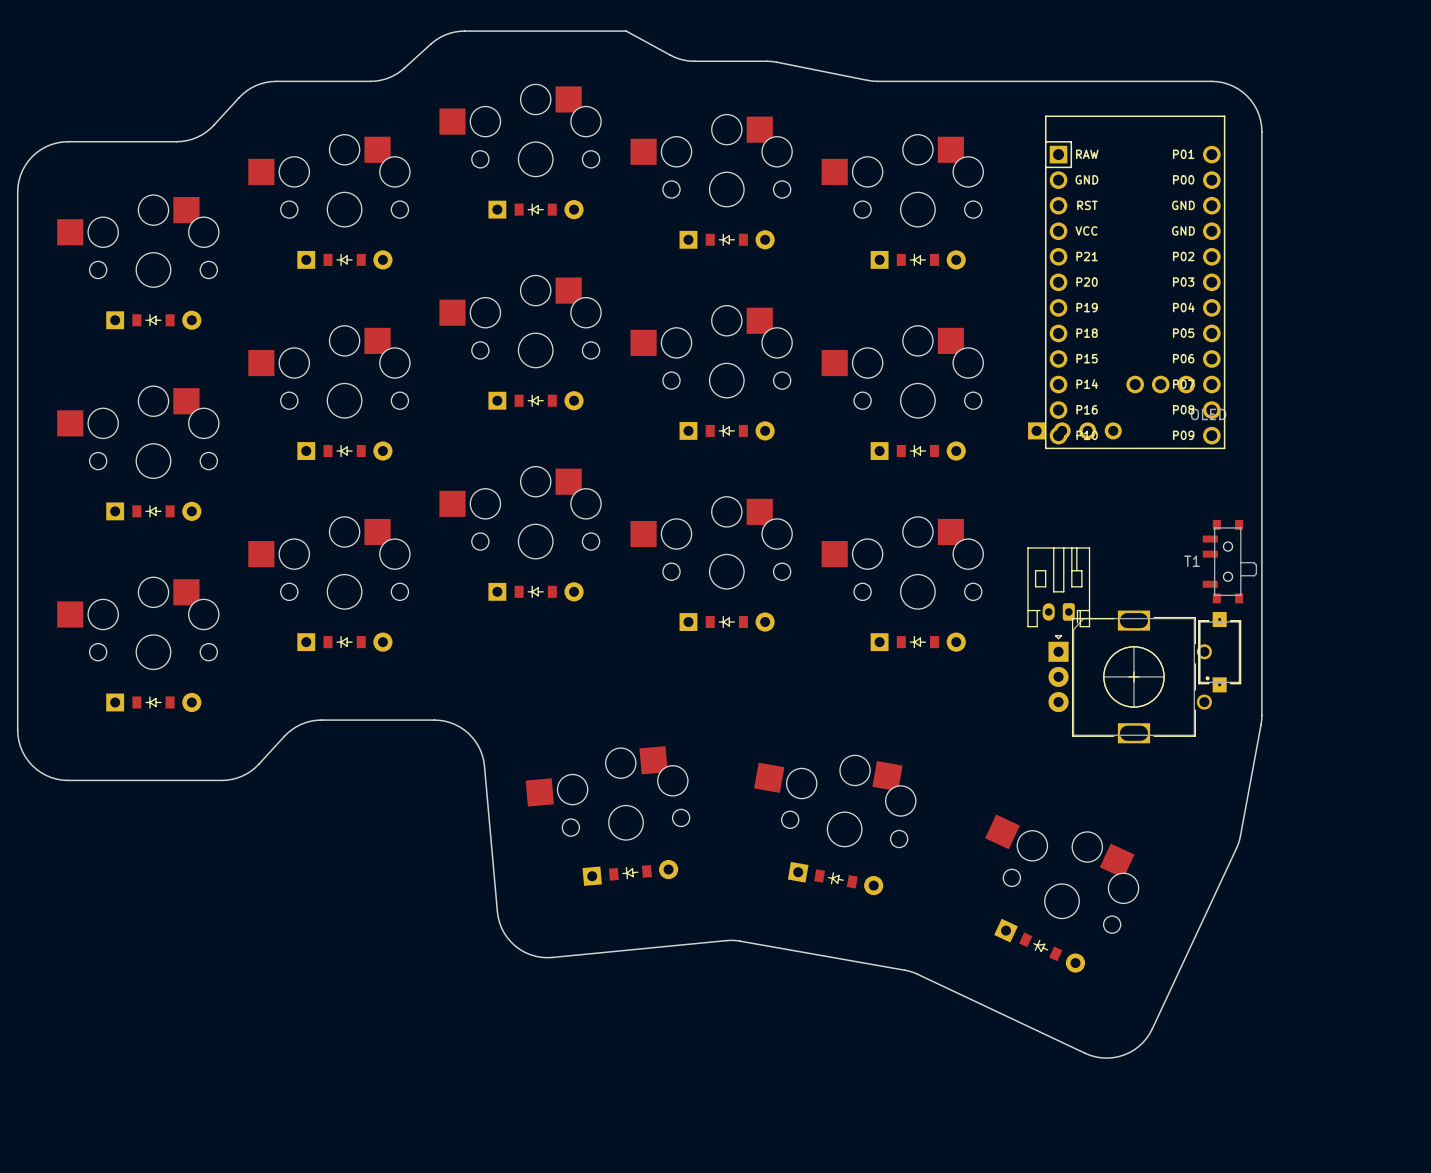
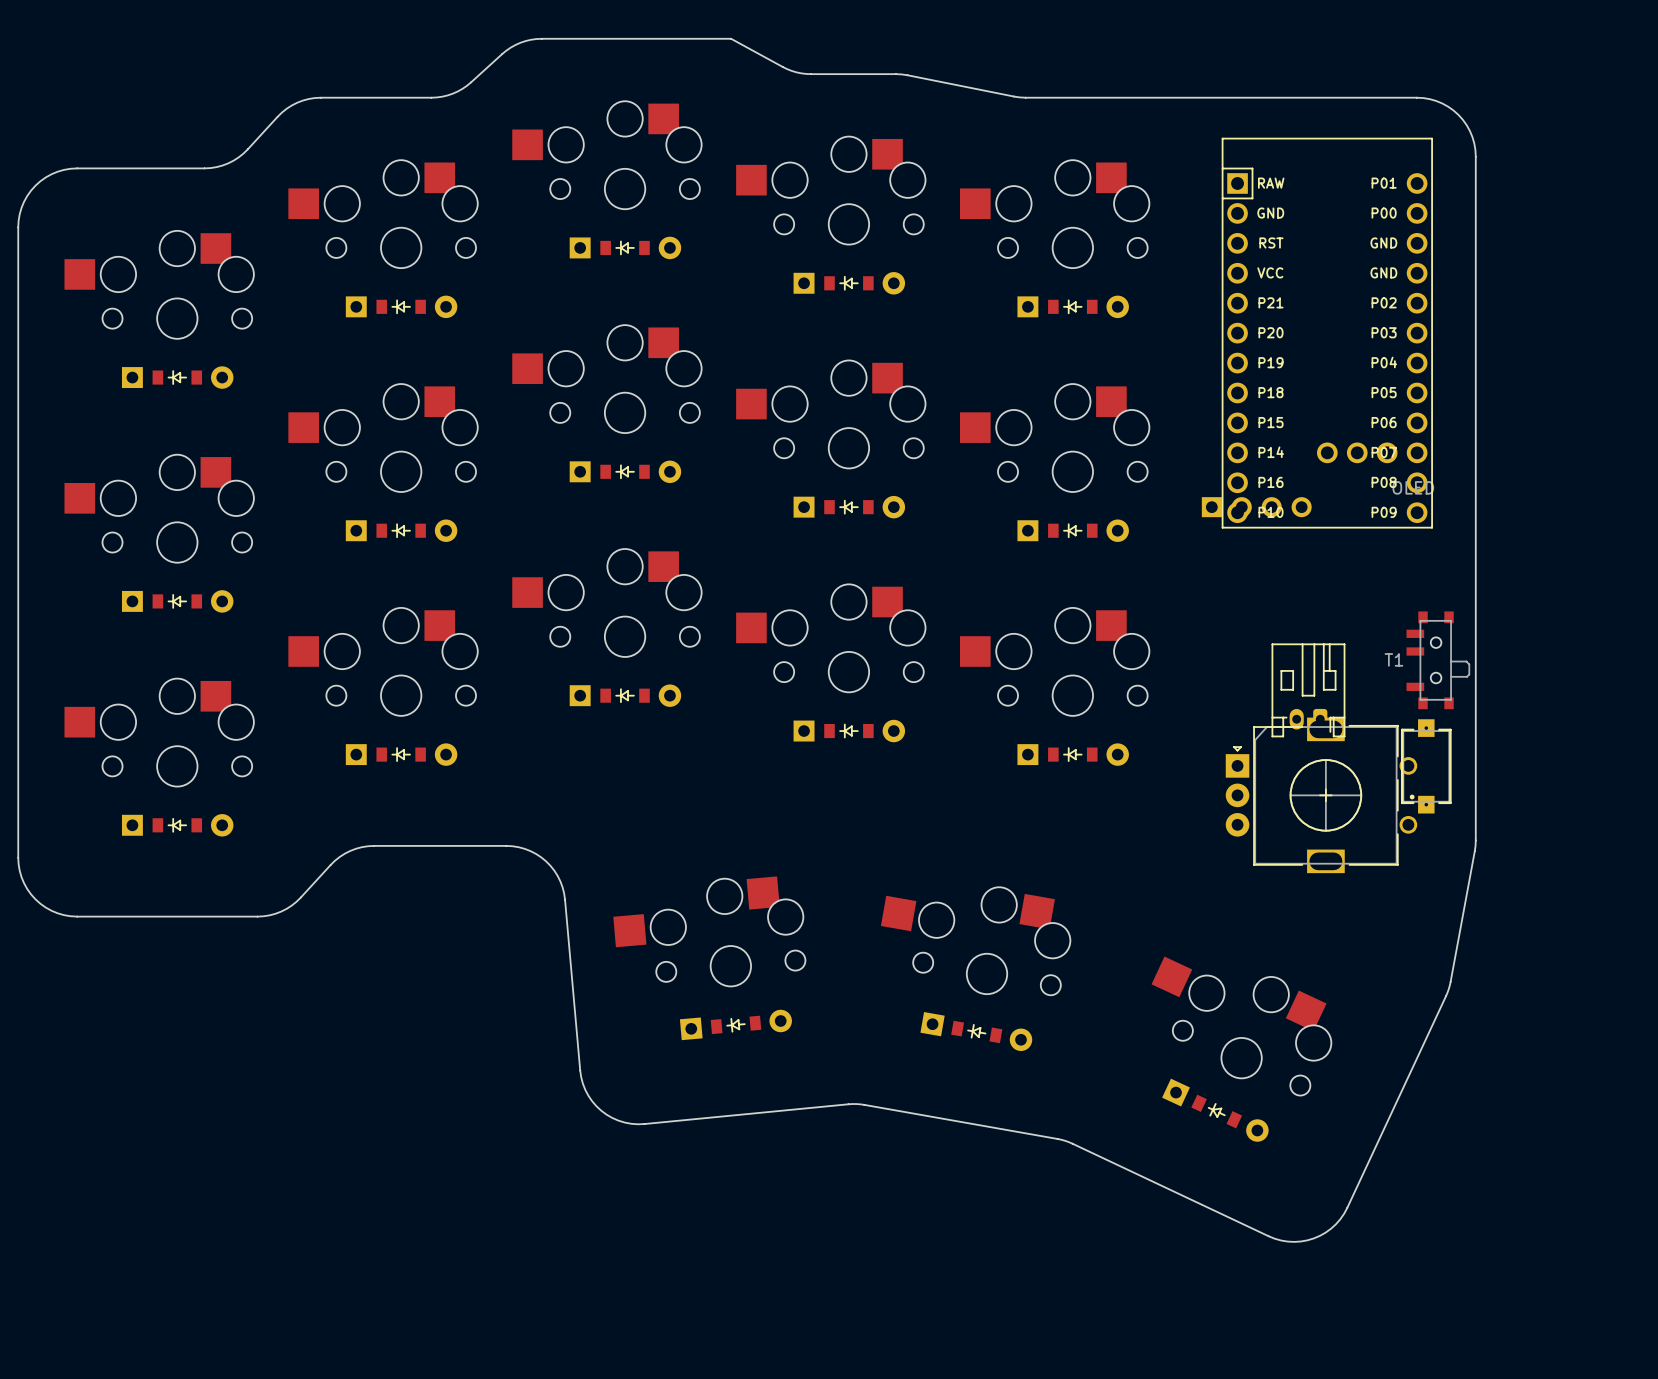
part position: (1058, 587) -> (1308, 690)

